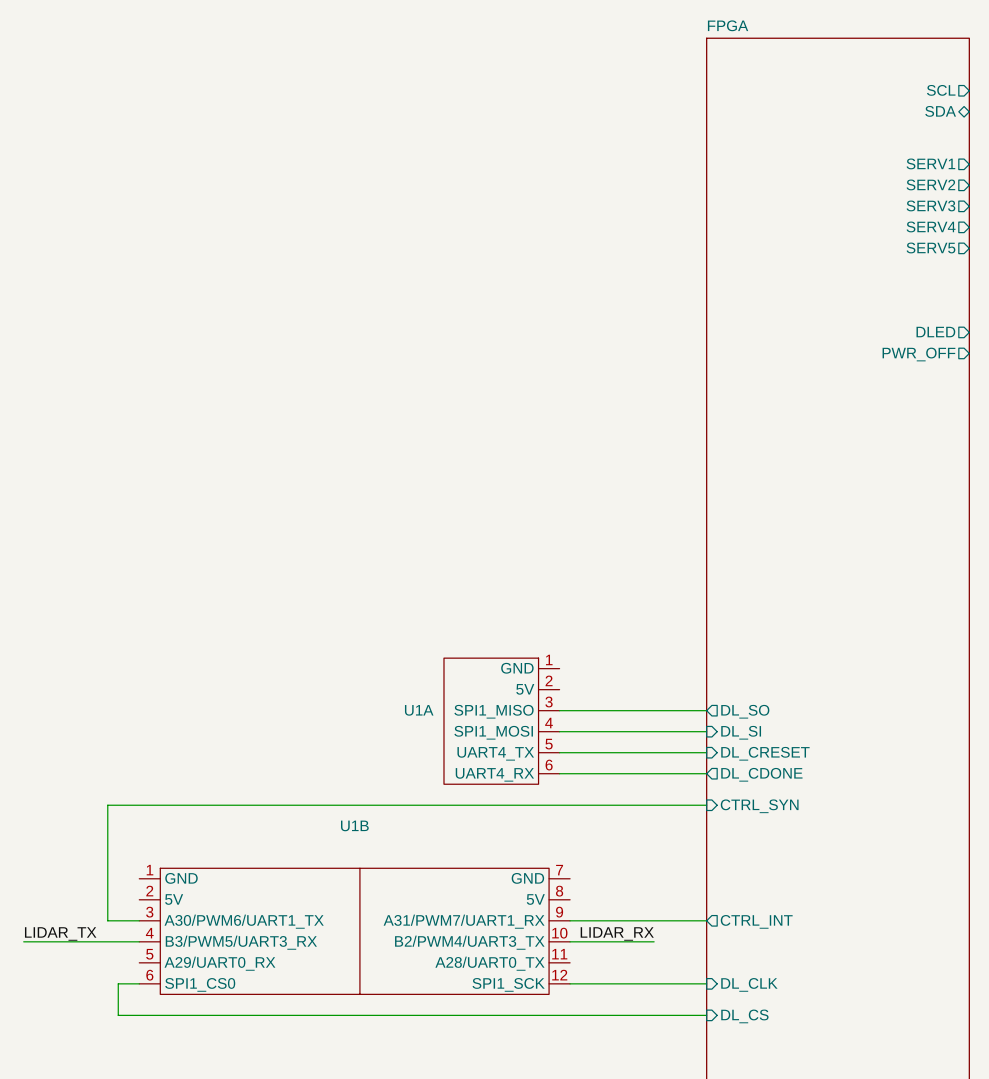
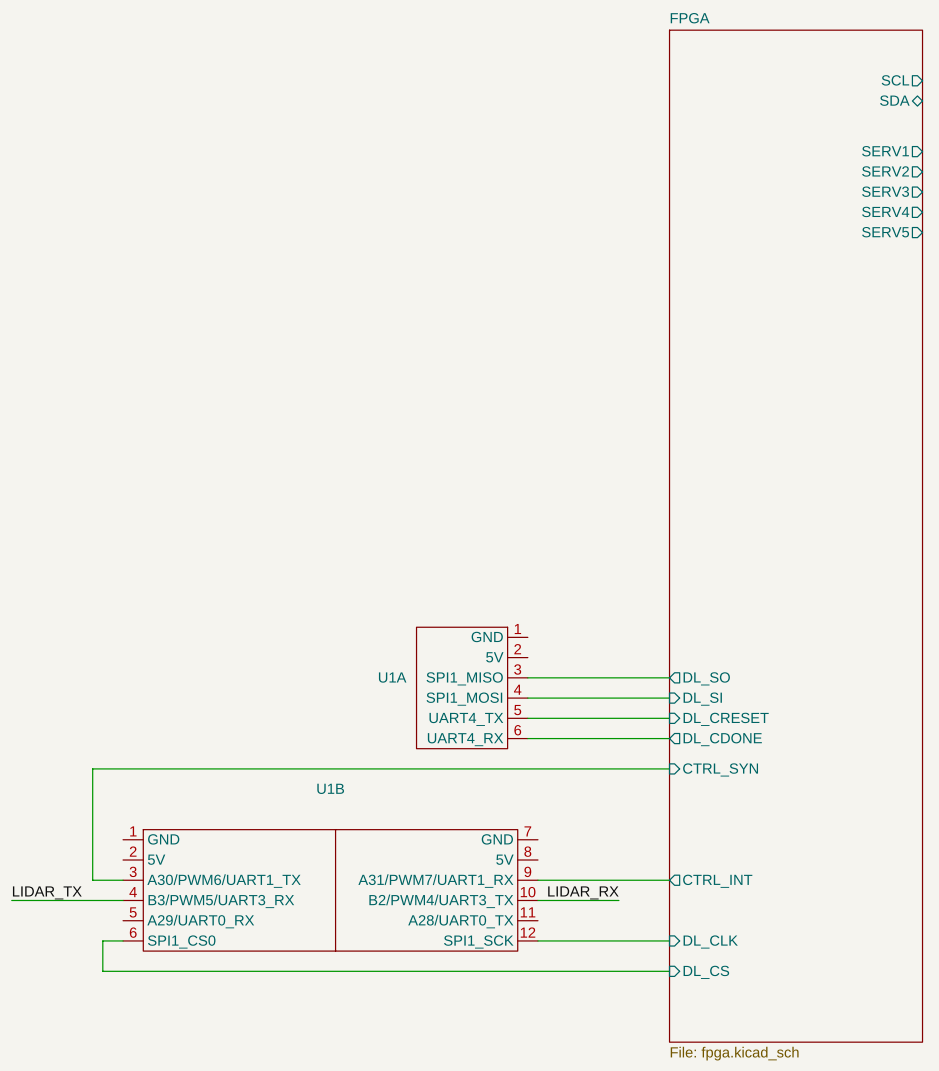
sheet pin: DLED (935, 332) -> none
sheet pin: PWR_OFF (918, 354) -> none

